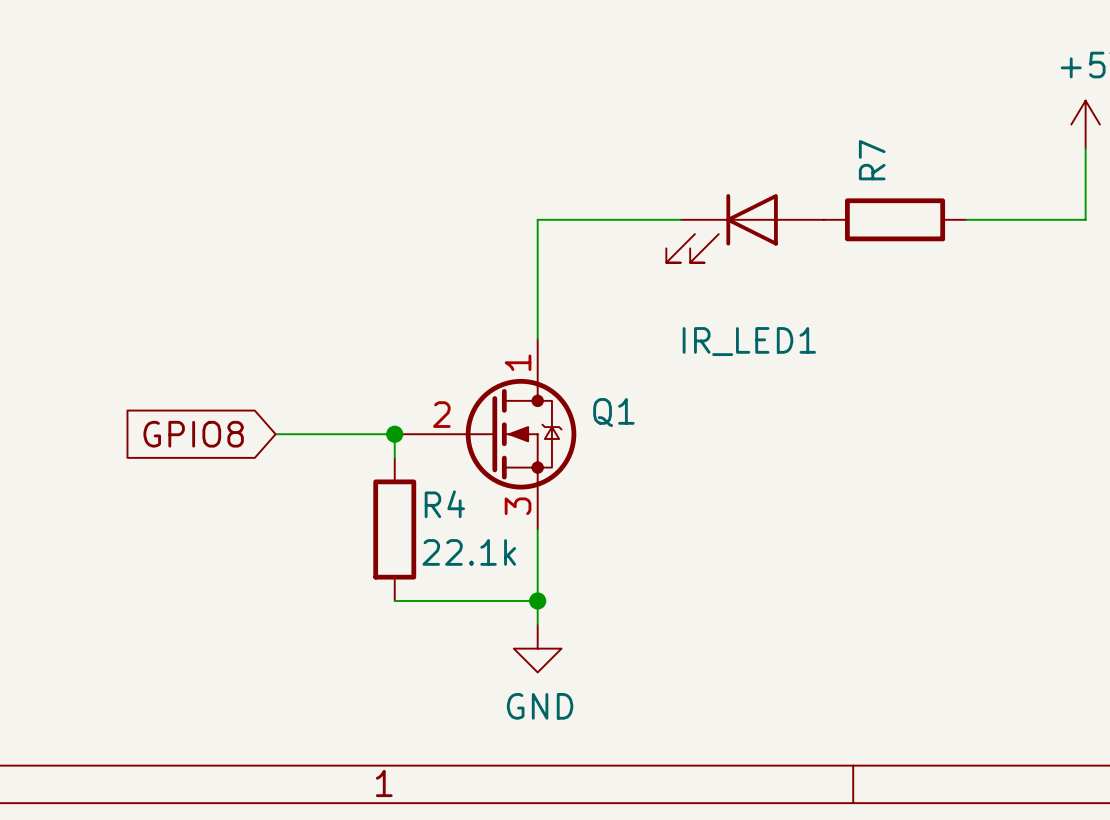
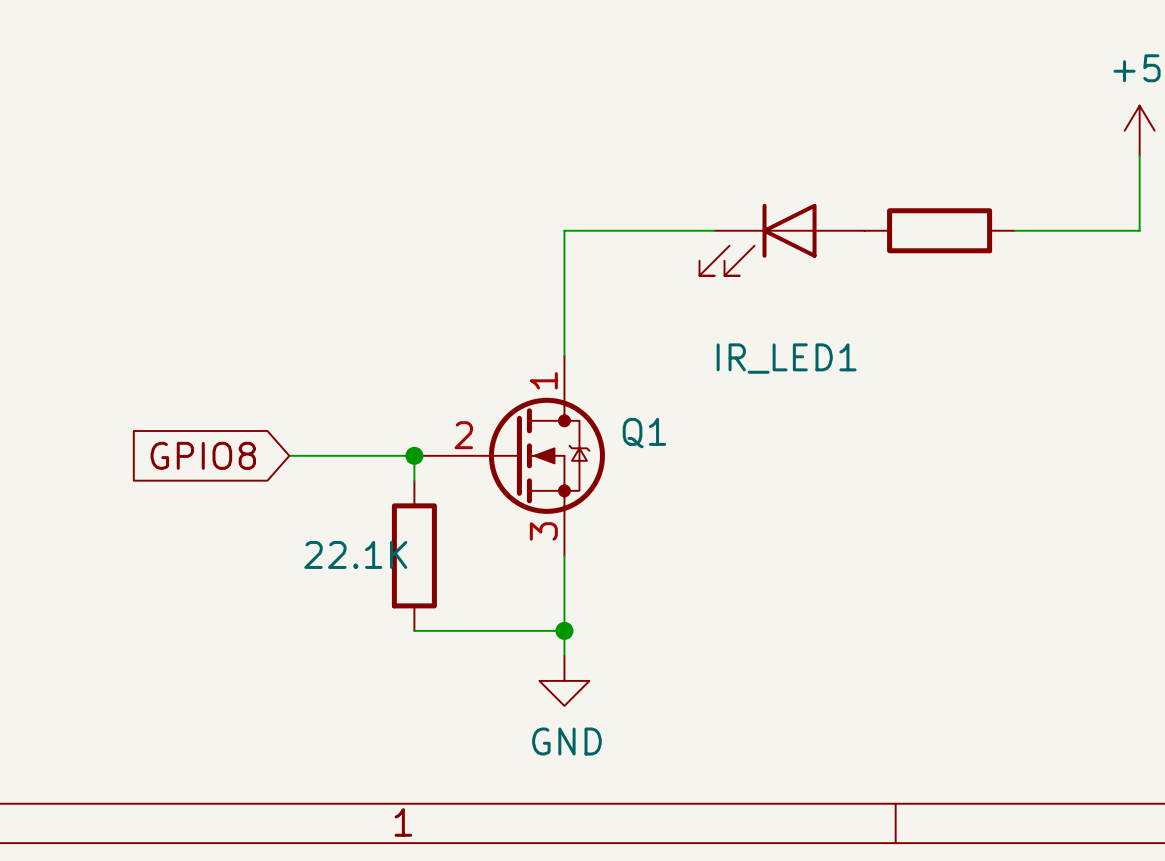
R7 name: R7 (872, 160) -> none
R4 name: R4 (444, 504) -> none
R4 value: 22.1k (469, 552) -> 22.1K (355, 554)

